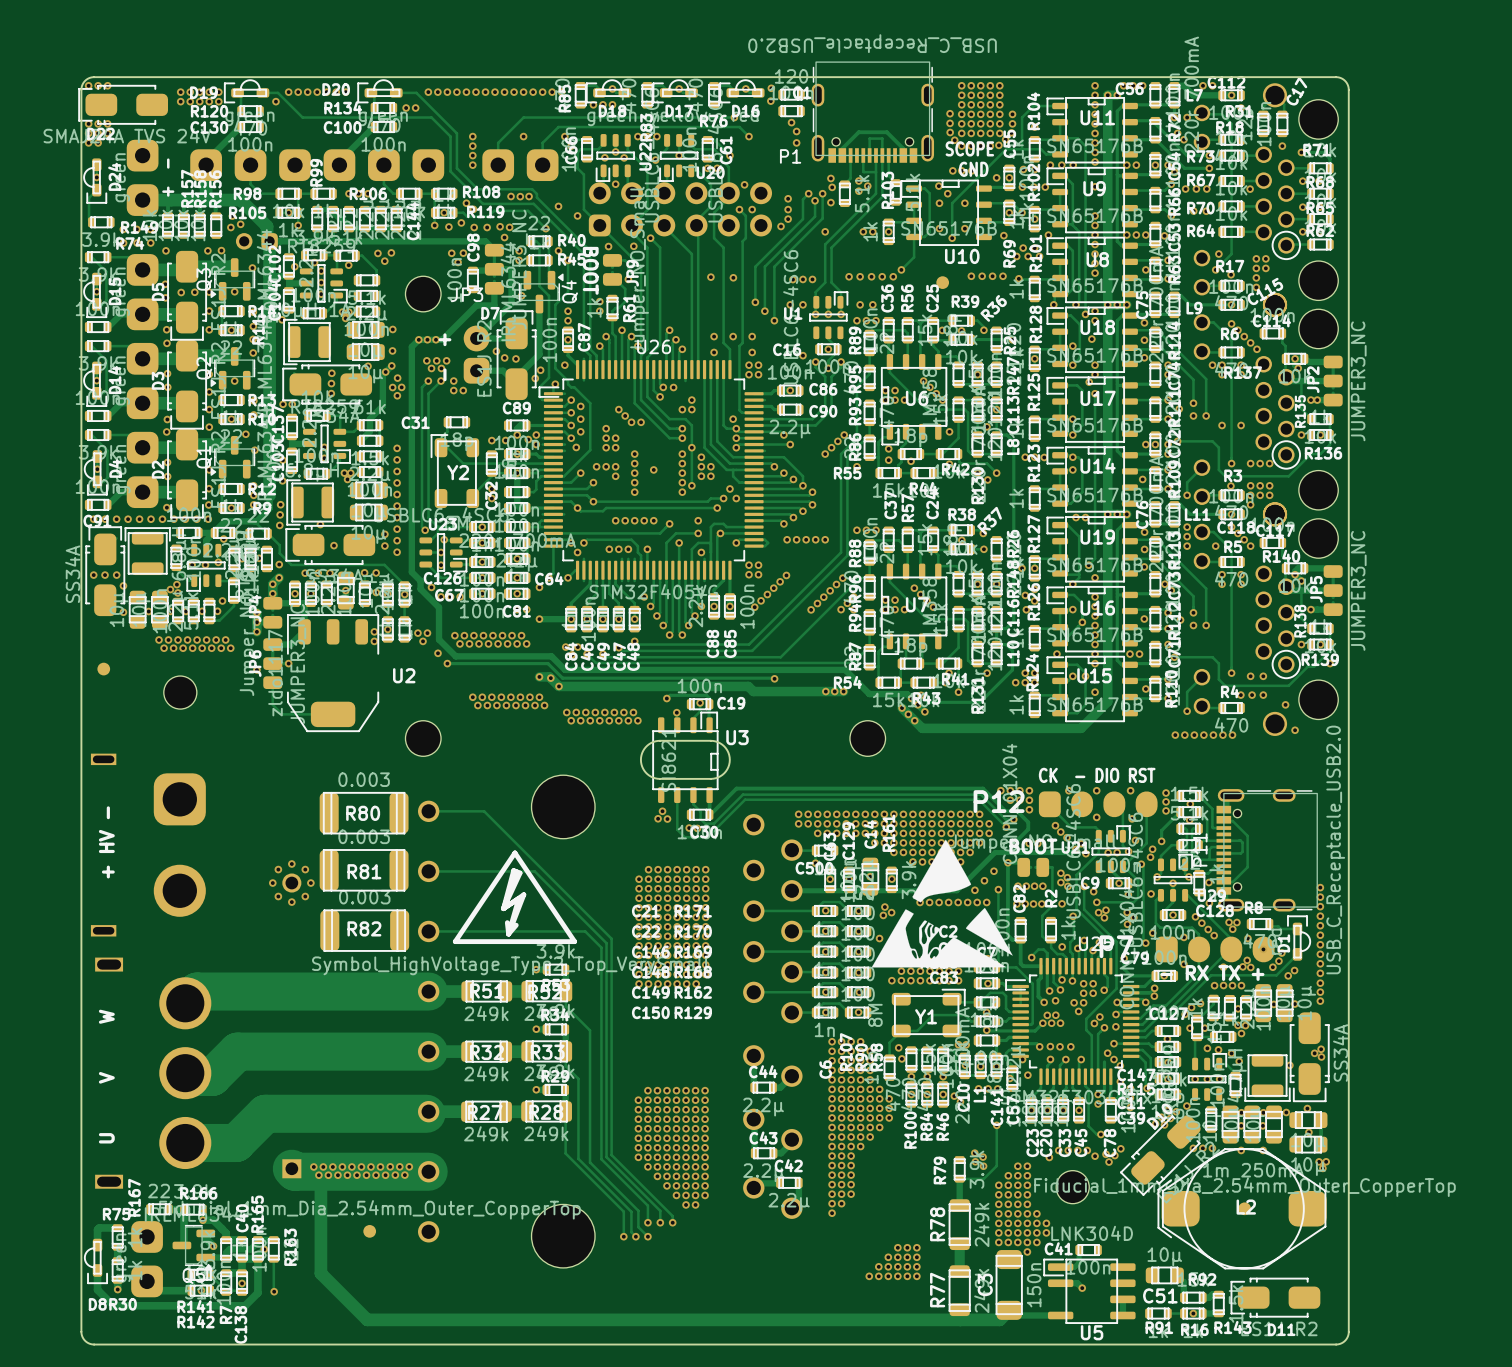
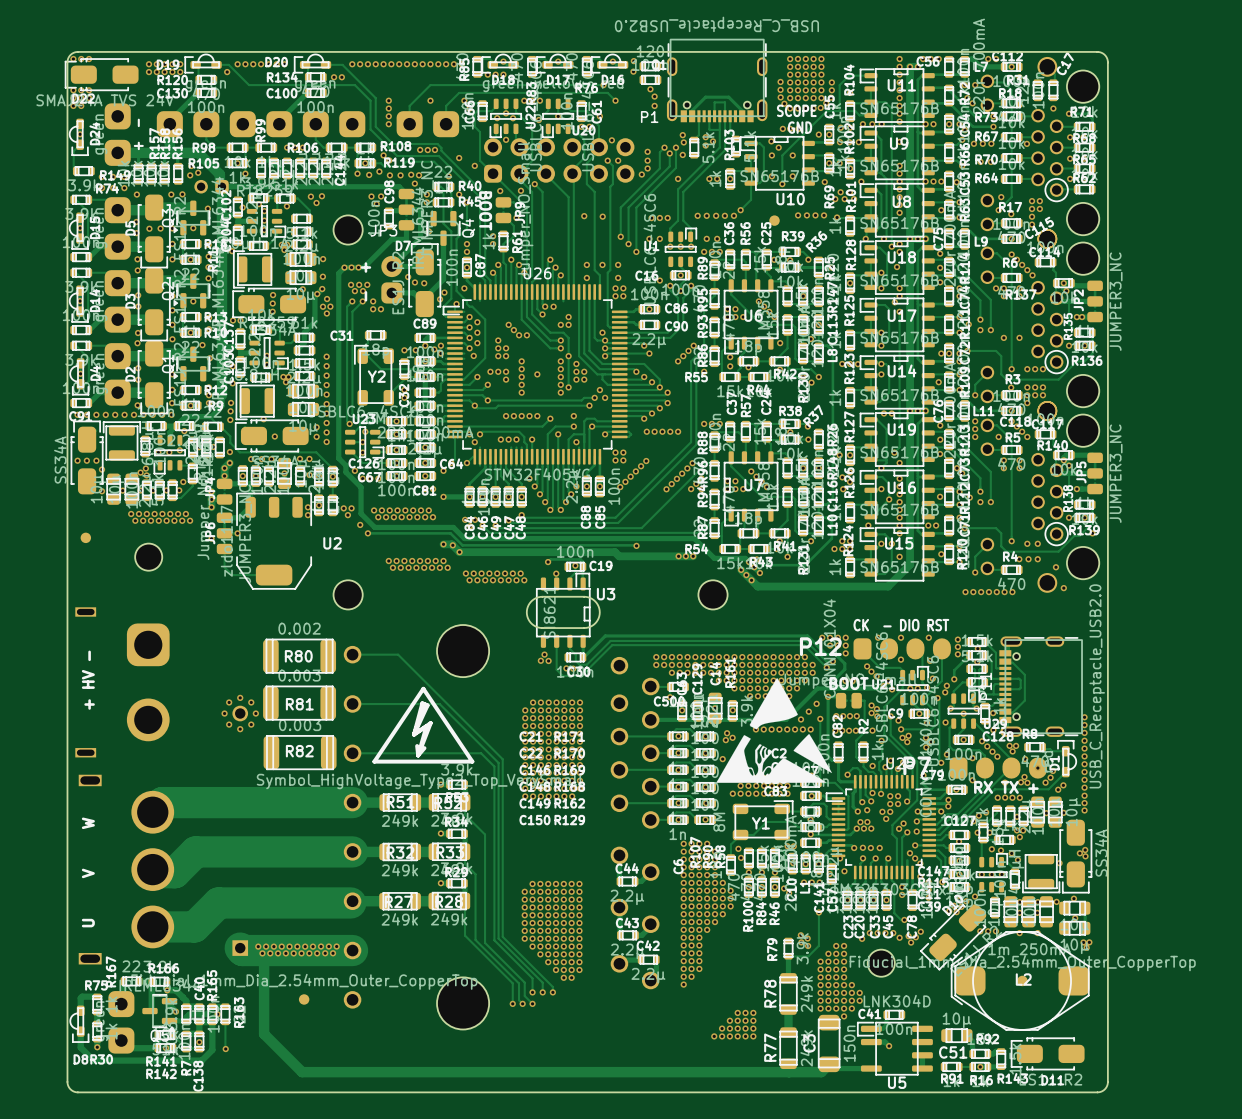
R80 value: 0.003 (364, 779) -> 0.002 (299, 628)

